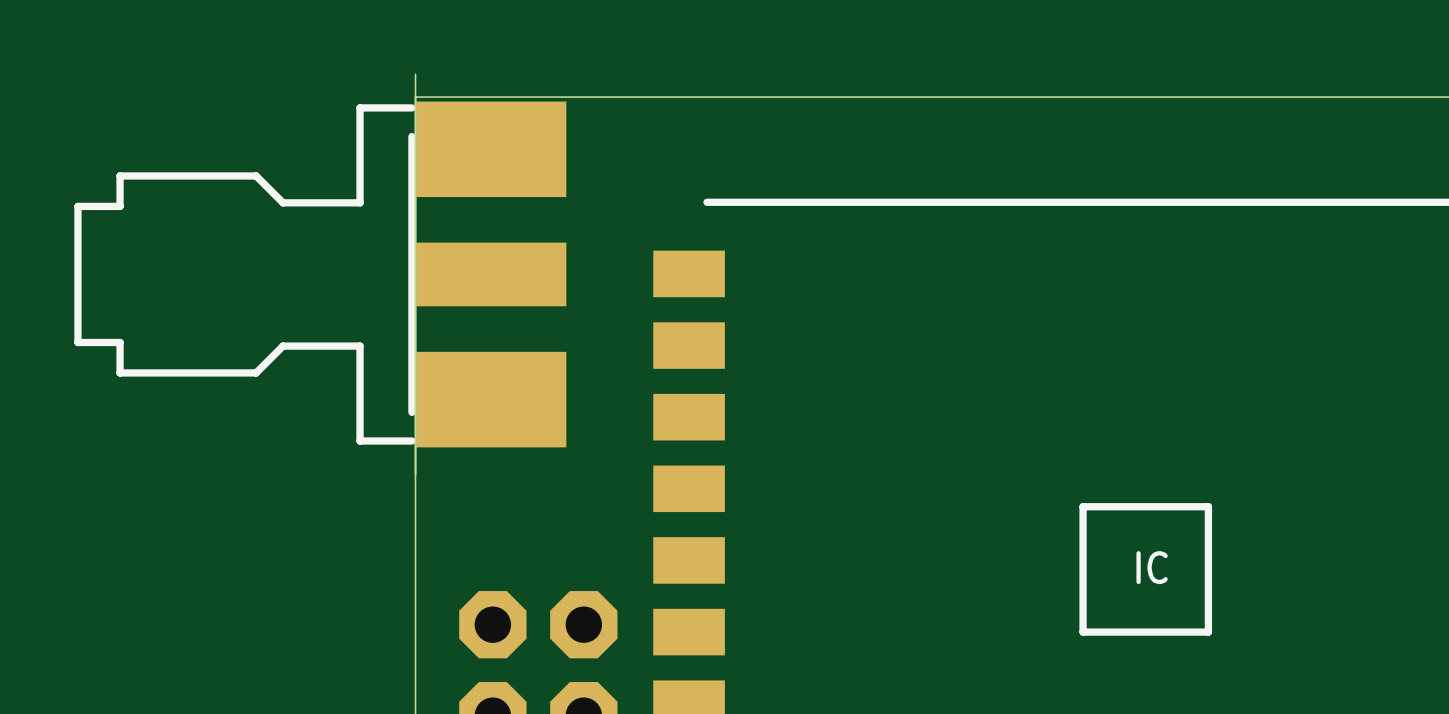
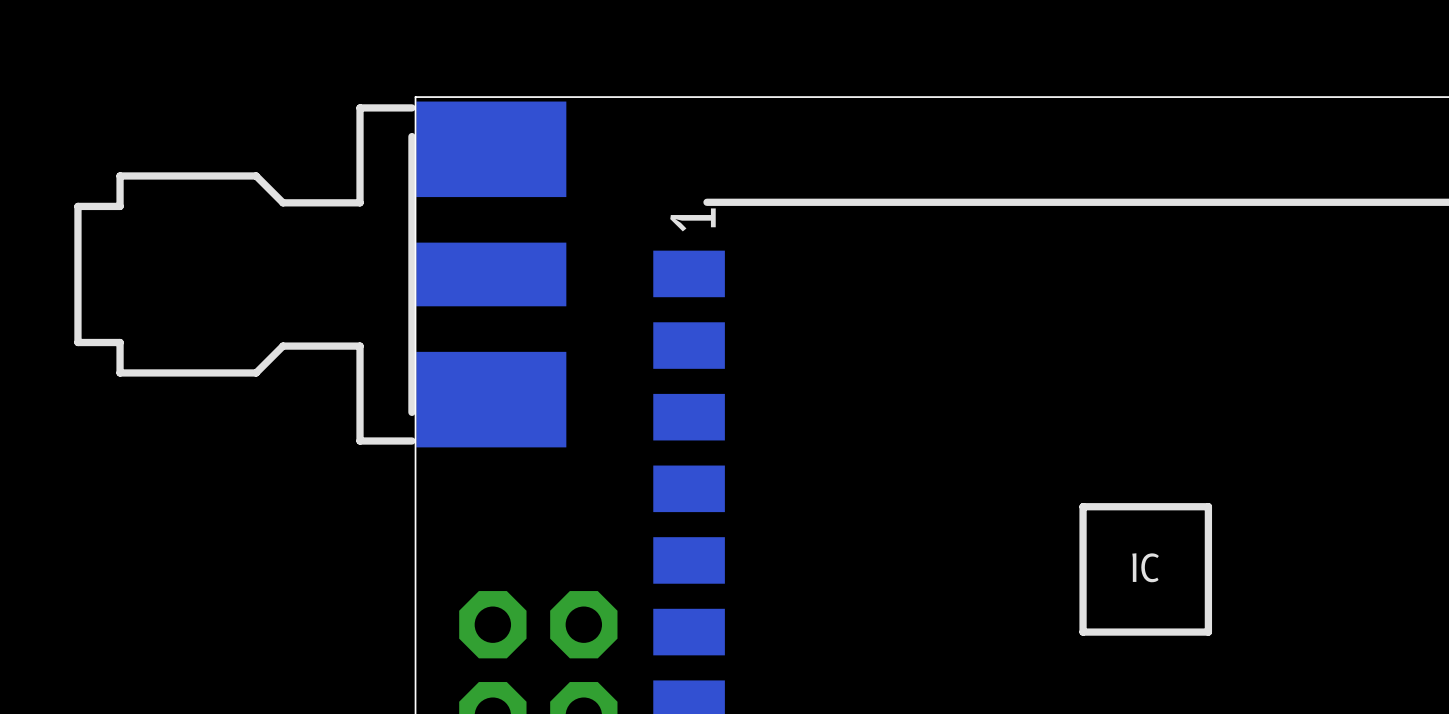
part footprint: [74, 74, 567, 475] -> [74, 101, 567, 448]
text: none -> 1 (692, 219)

